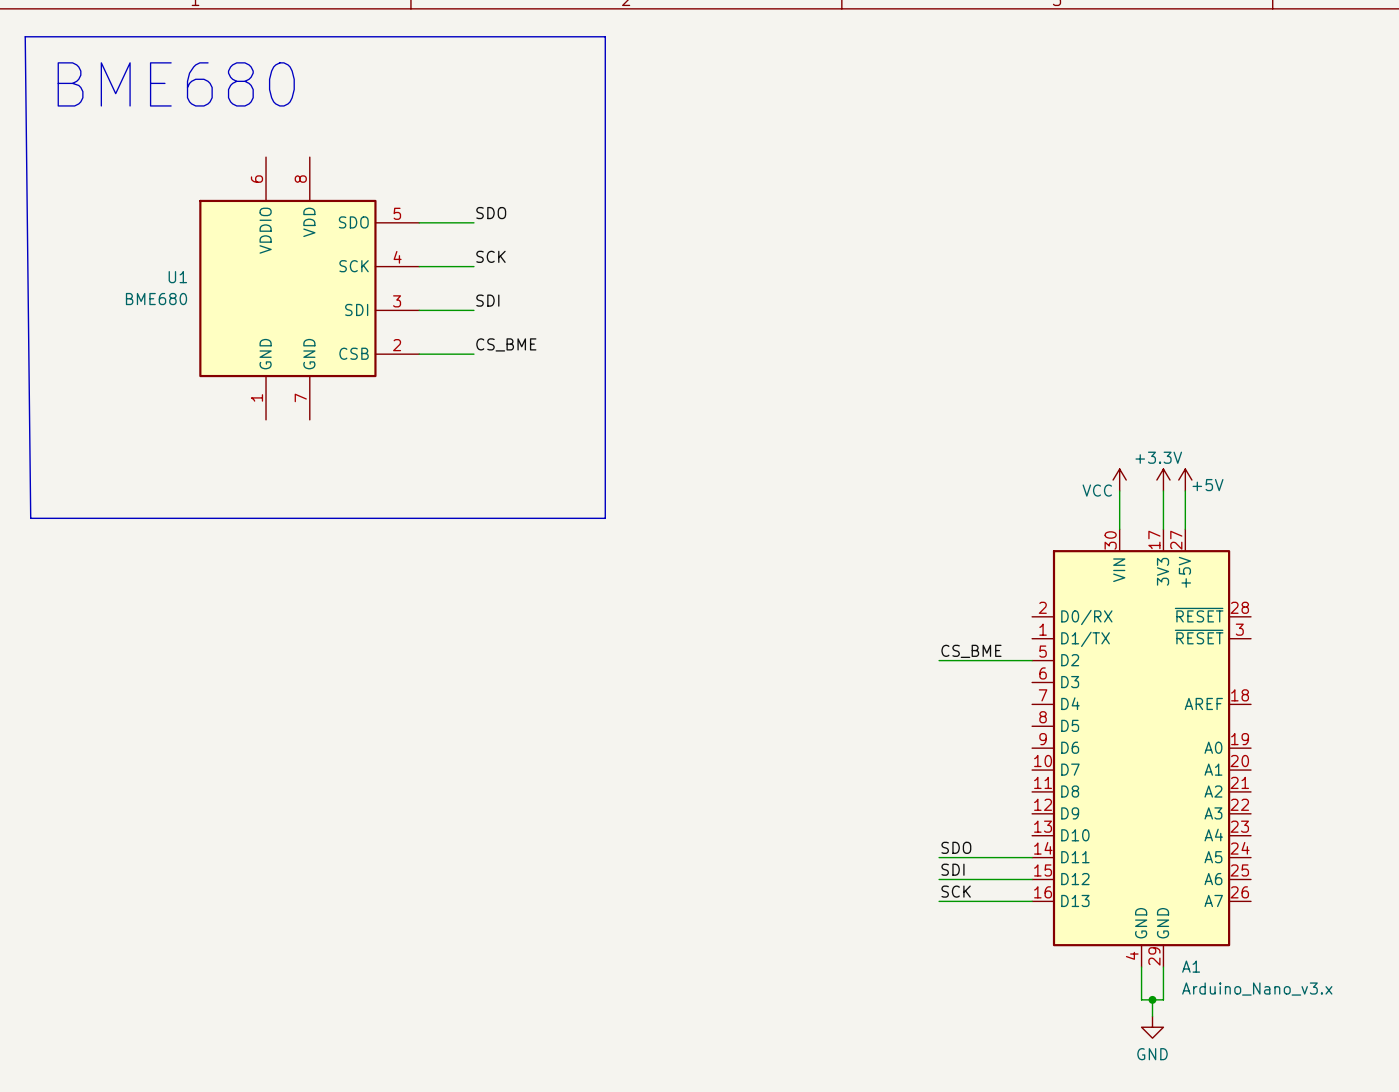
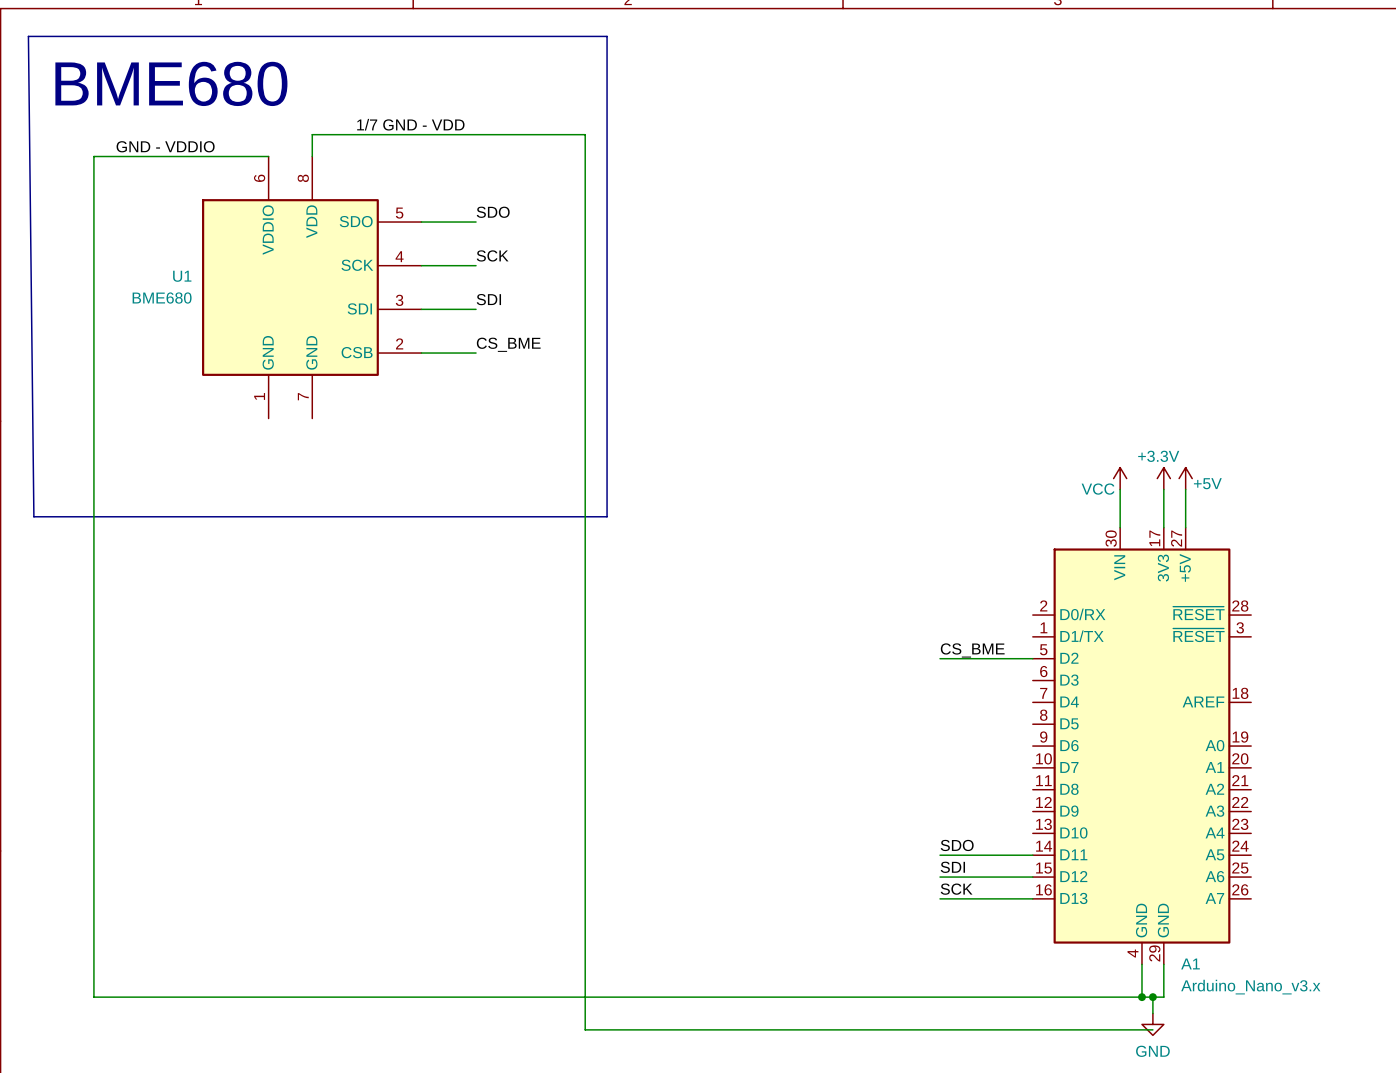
label: none -> 1/7 GND - VDD (410, 124)
label: none -> GND - VDDIO (165, 146)
wire: none -> (268, 156) (93, 156) (93, 997) (1141, 997)
wire: none -> (312, 156) (312, 134) (585, 134) (585, 1029) (1152, 1029)
junction: none -> (1141, 997)

